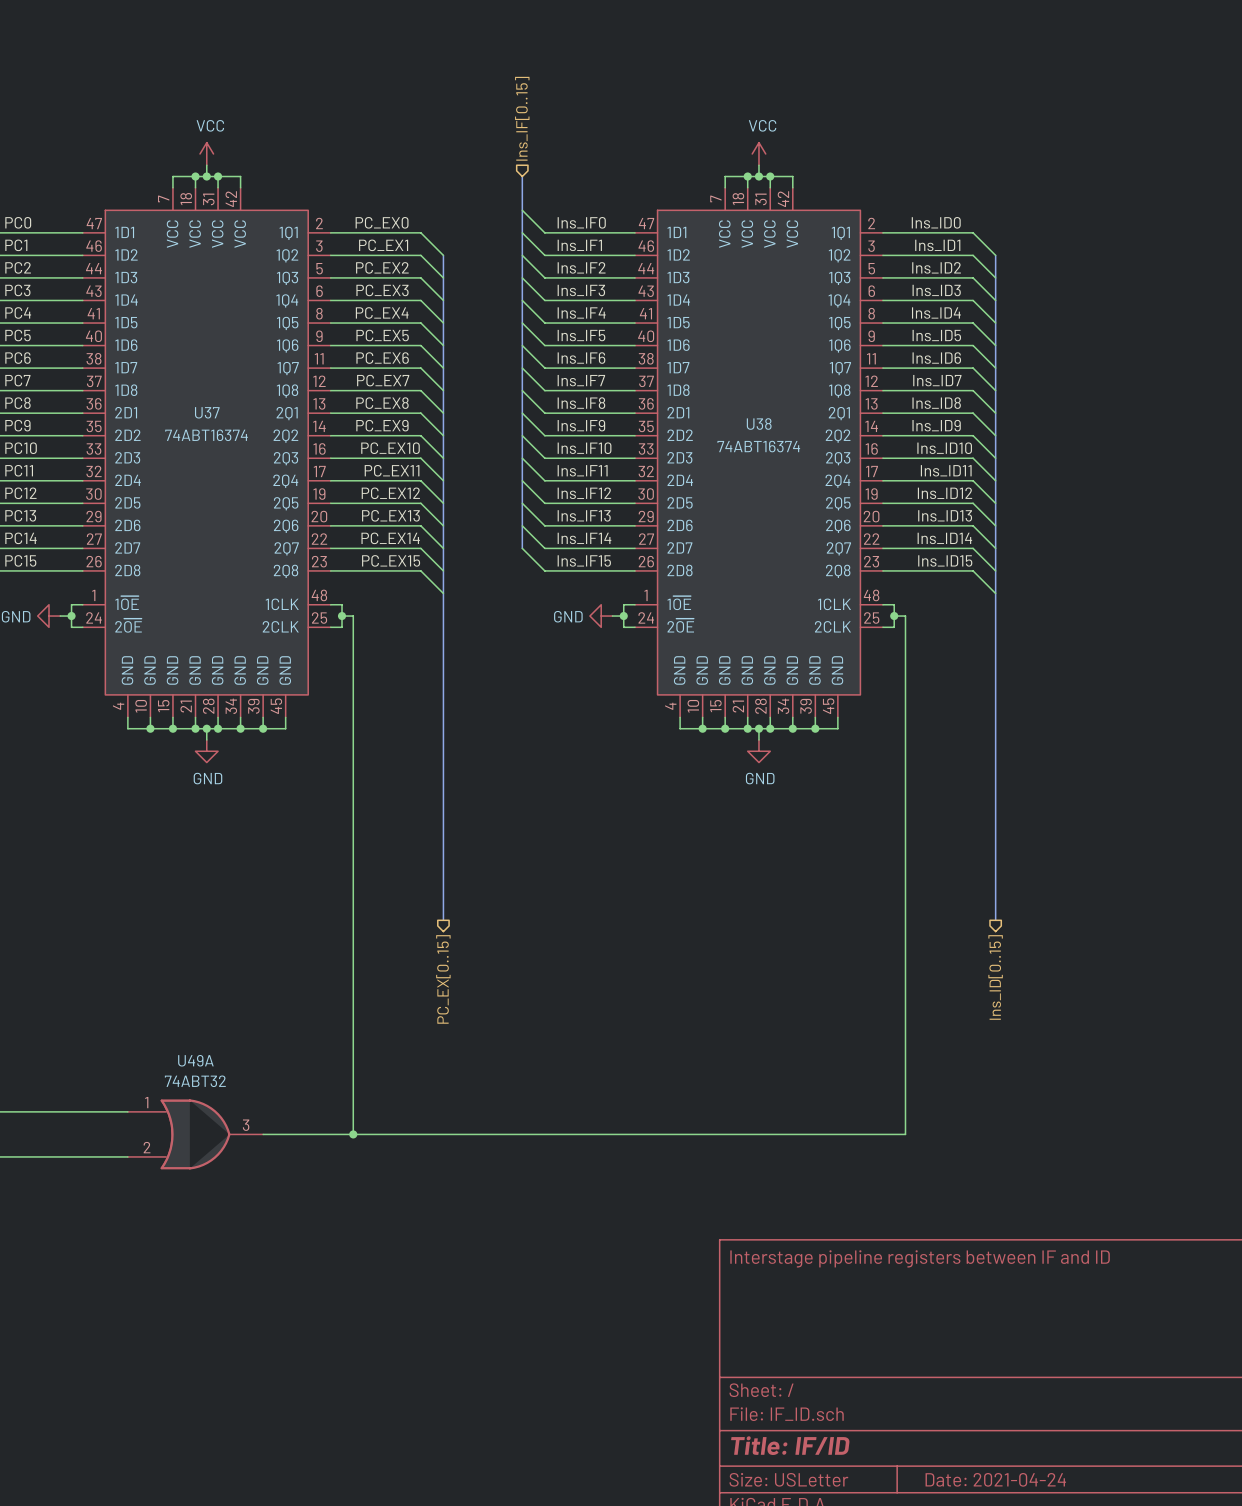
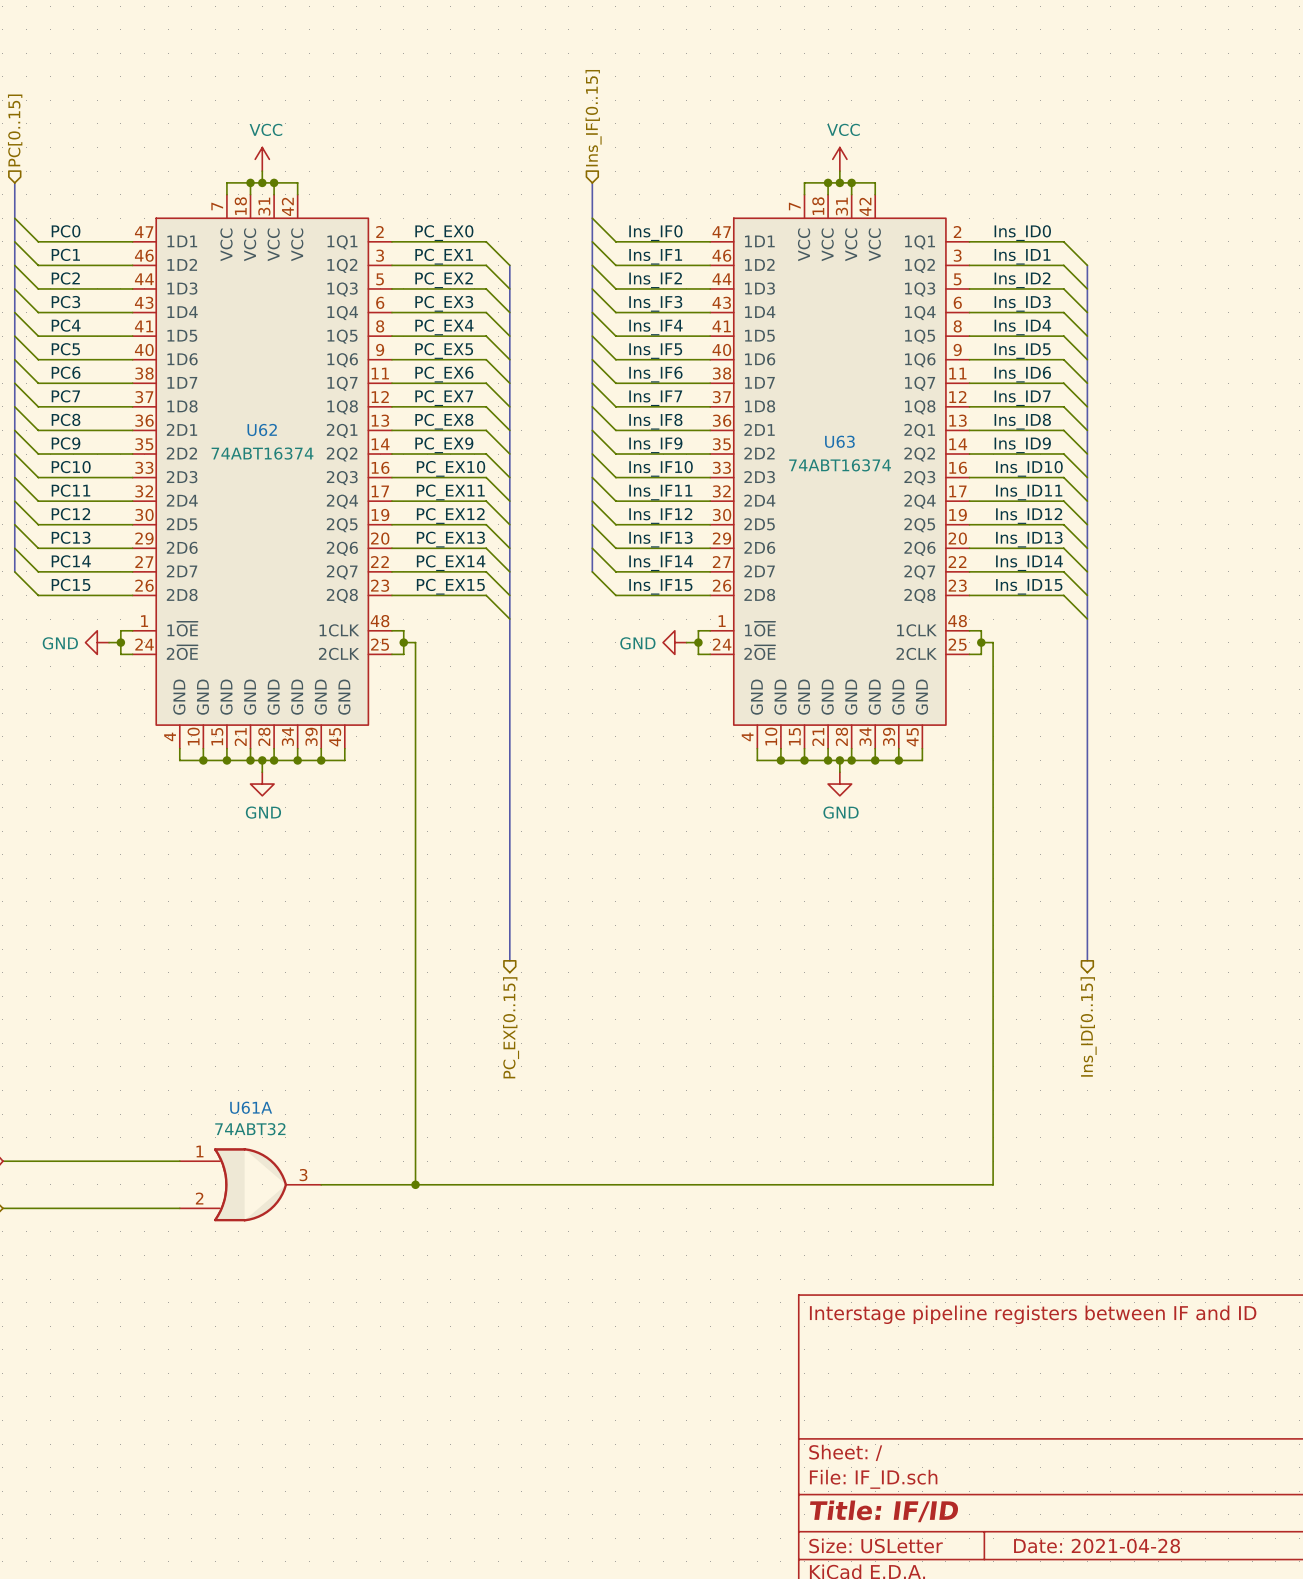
U37 name: U37 (207, 412) -> U62 (262, 429)
U38 name: U38 (759, 424) -> U63 (839, 441)
U49A name: U49A (195, 1060) -> U61A (251, 1107)
title block: Date: 2021-04-24 (995, 1479) -> Date: 2021-04-28 (1097, 1546)

